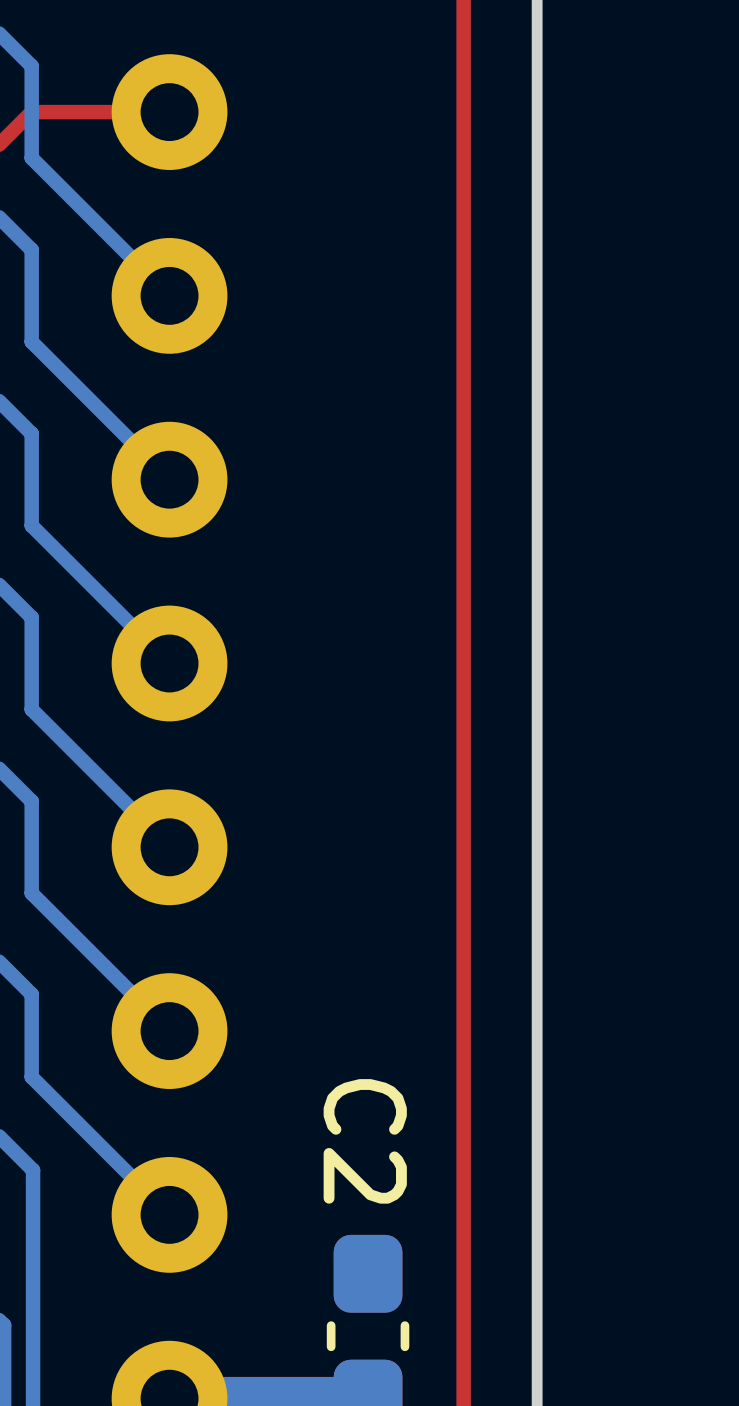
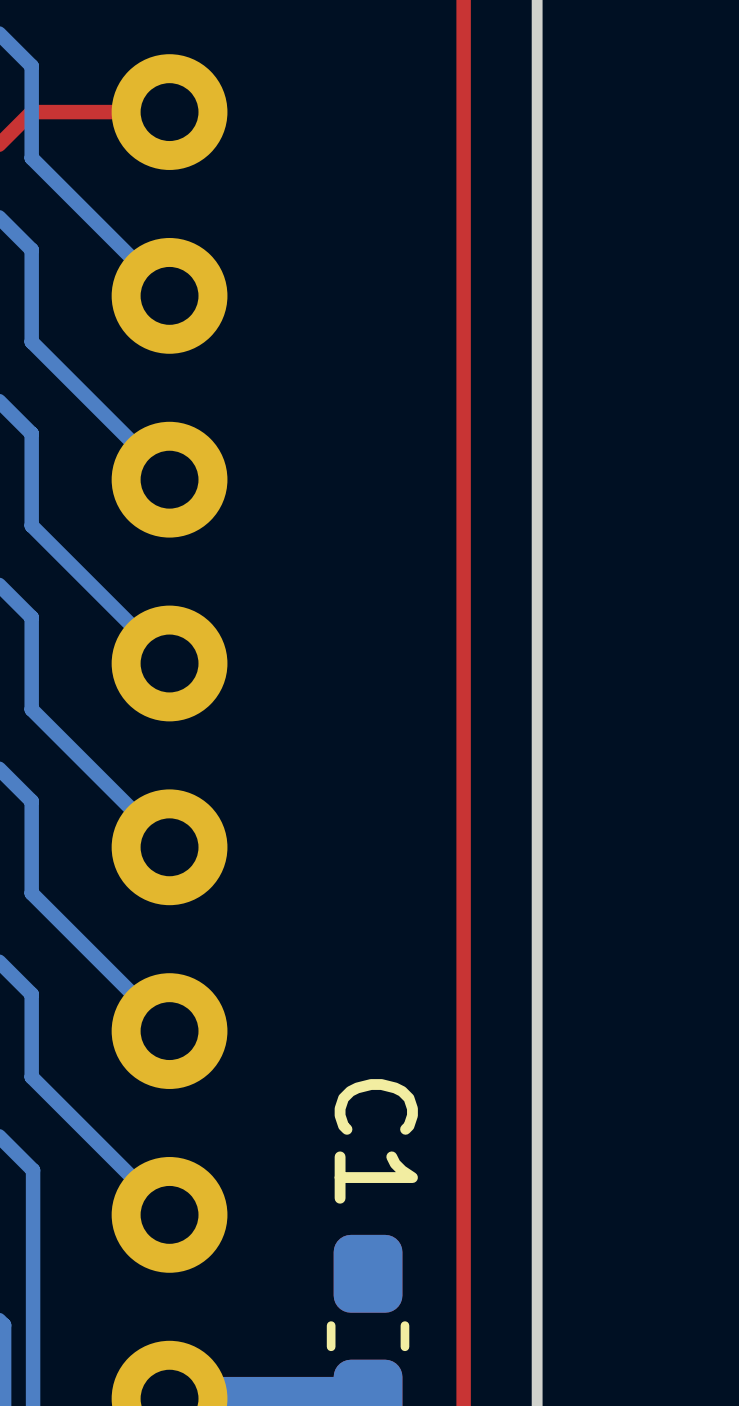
C2 name: C2 (365, 1141) -> C1 (376, 1141)

